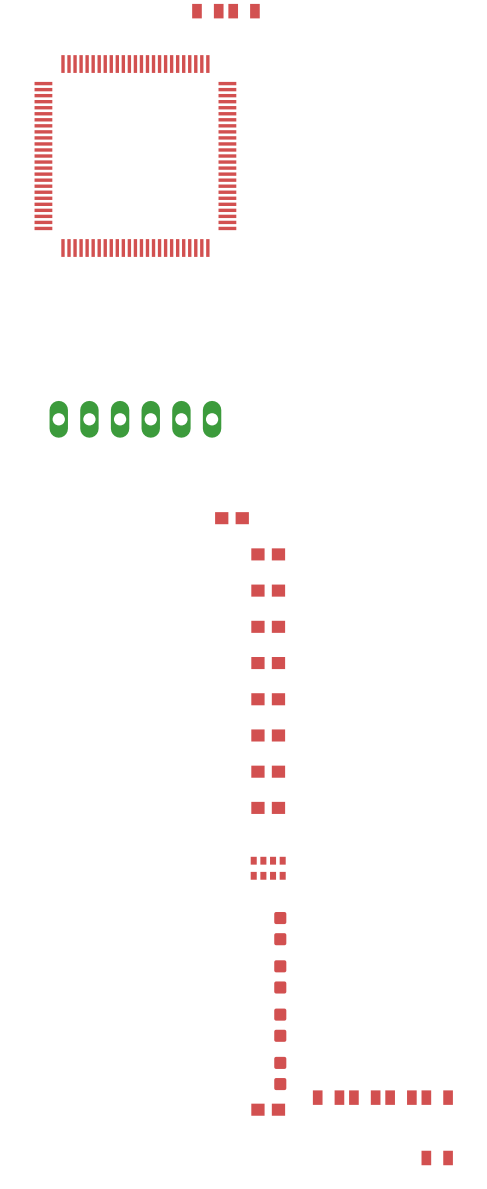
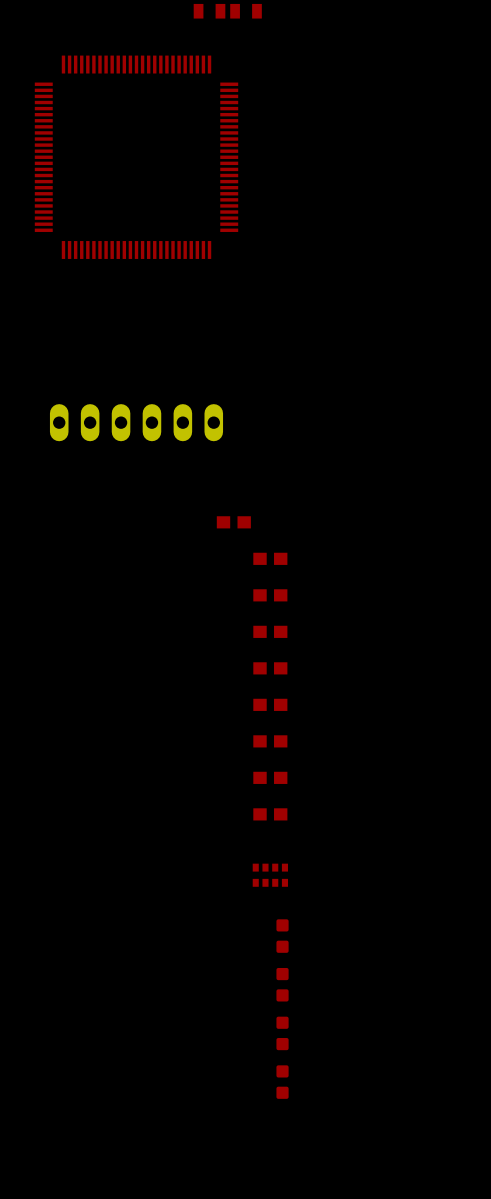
part: (328, 1097) -> none
part: (364, 1097) -> none
part: (400, 1097) -> none
part: (437, 1097) -> none
part: (268, 1109) -> none
part: (437, 1157) -> none

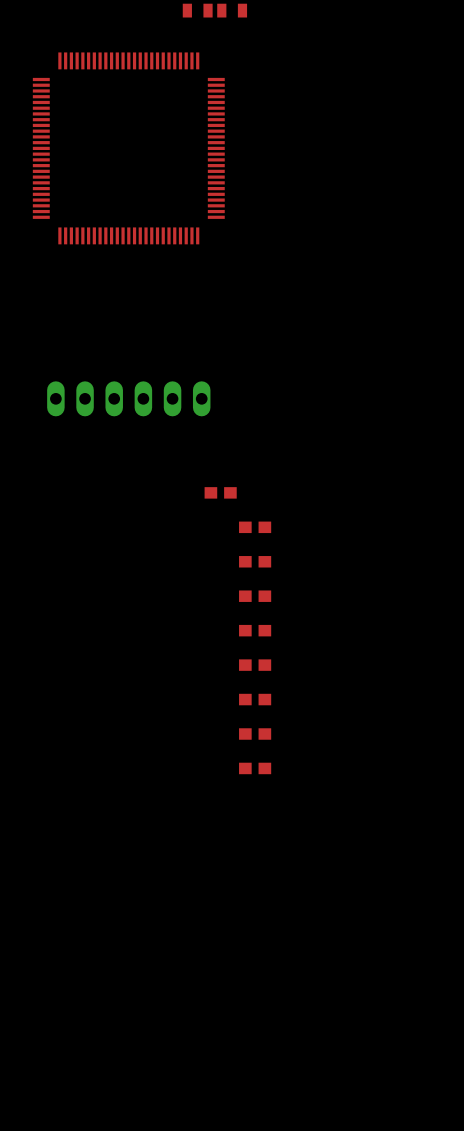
part: (270, 875) -> none
part: (282, 936) -> none
part: (282, 984) -> none
part: (282, 1033) -> none
part: (282, 1082) -> none

